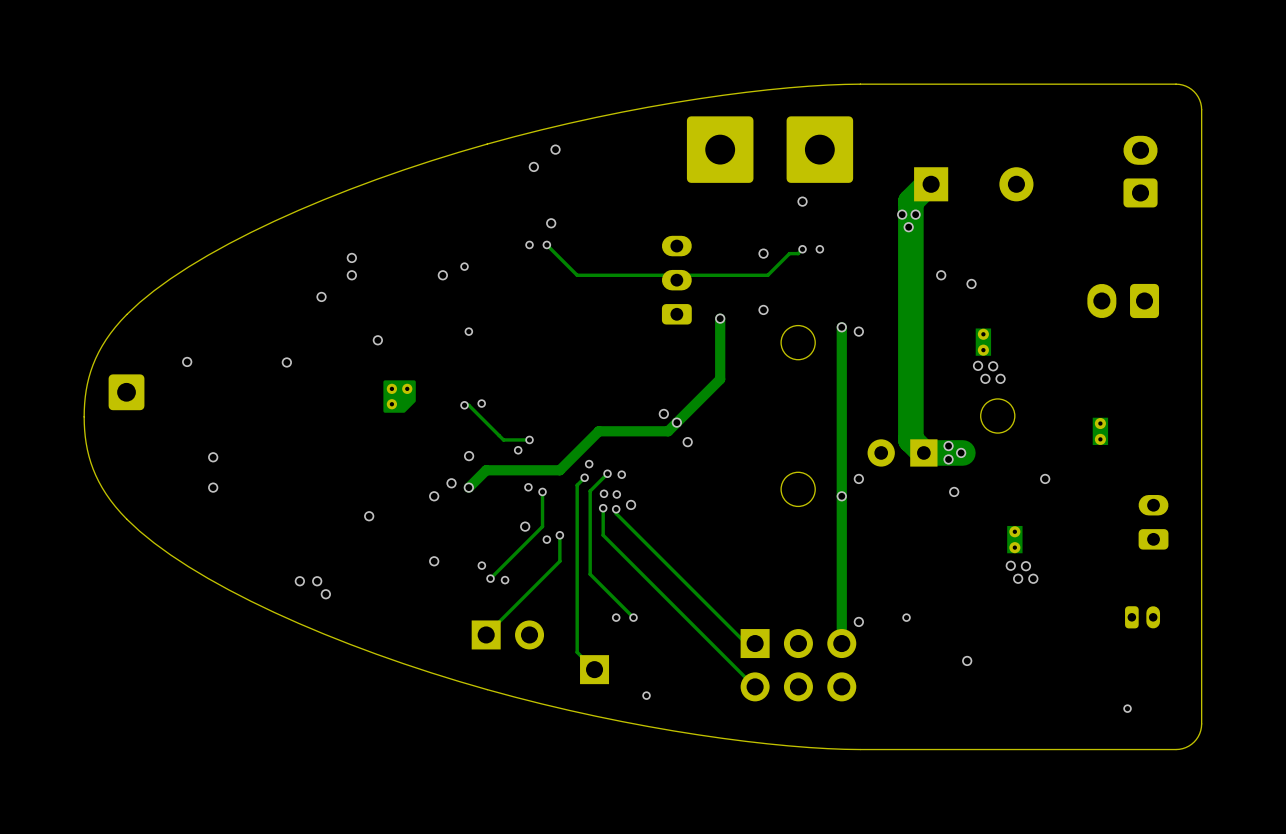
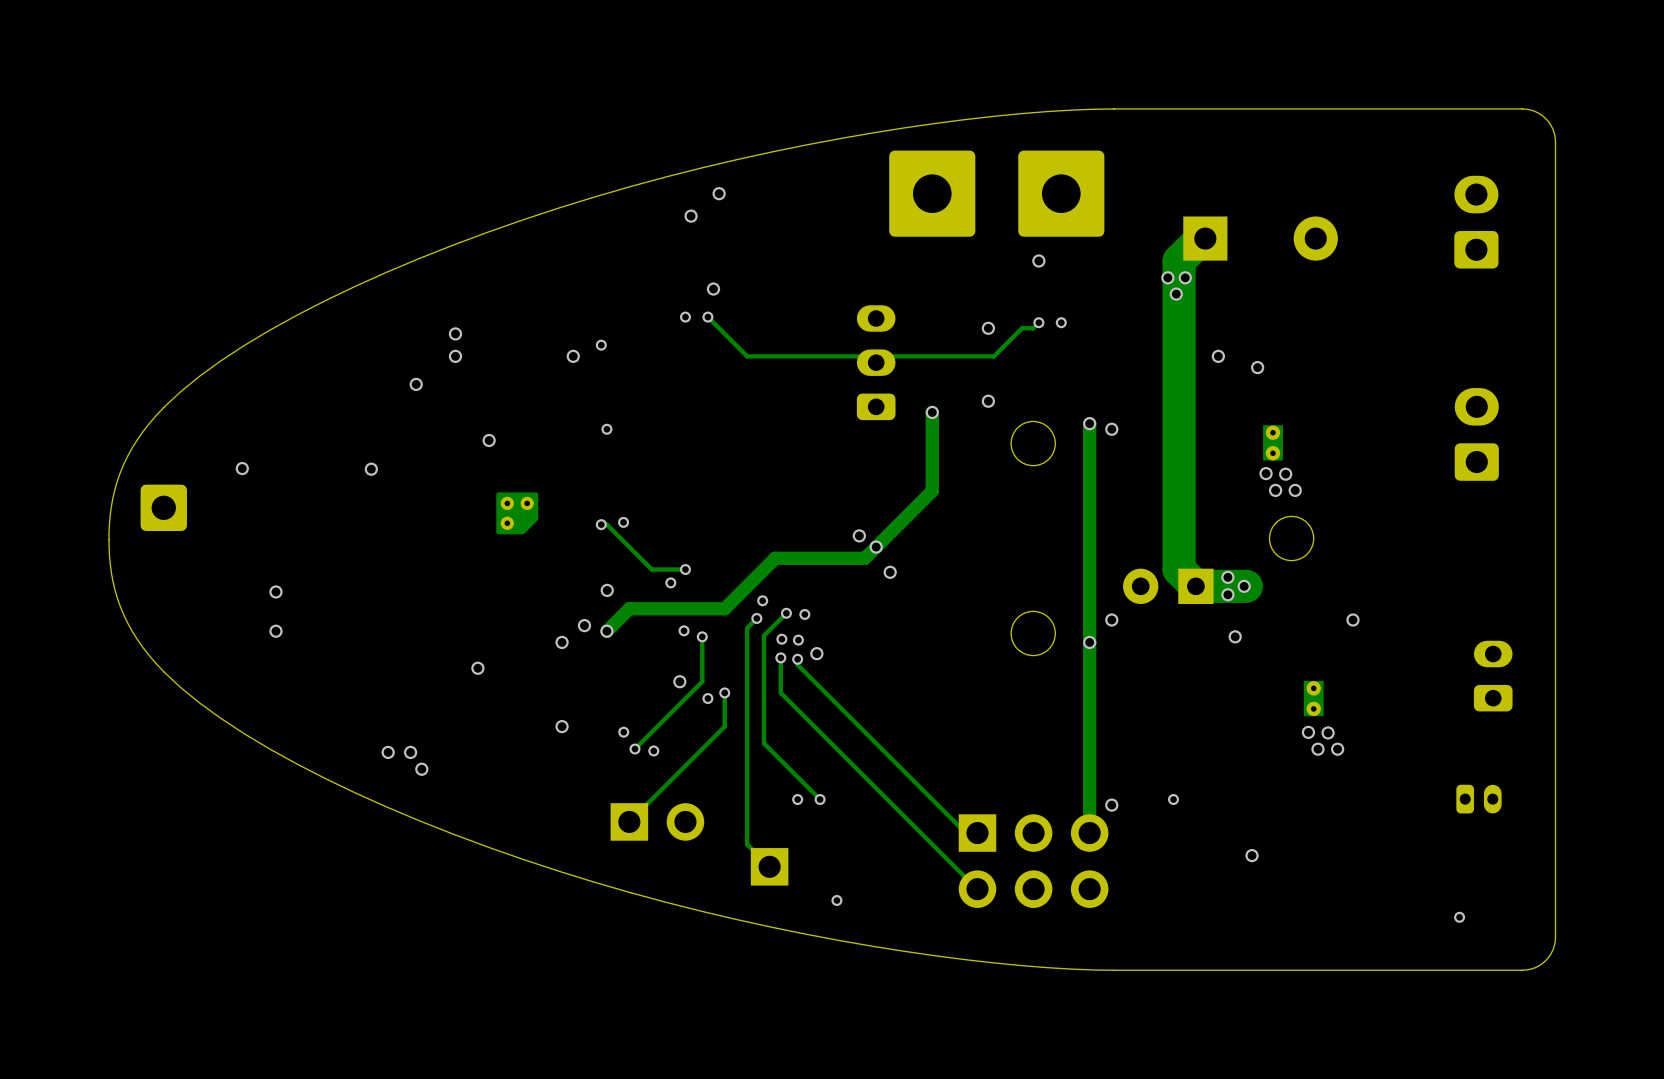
part rotation: 0° (1123, 300) -> 90° clockwise (1476, 434)
part: (1100, 431) -> none

